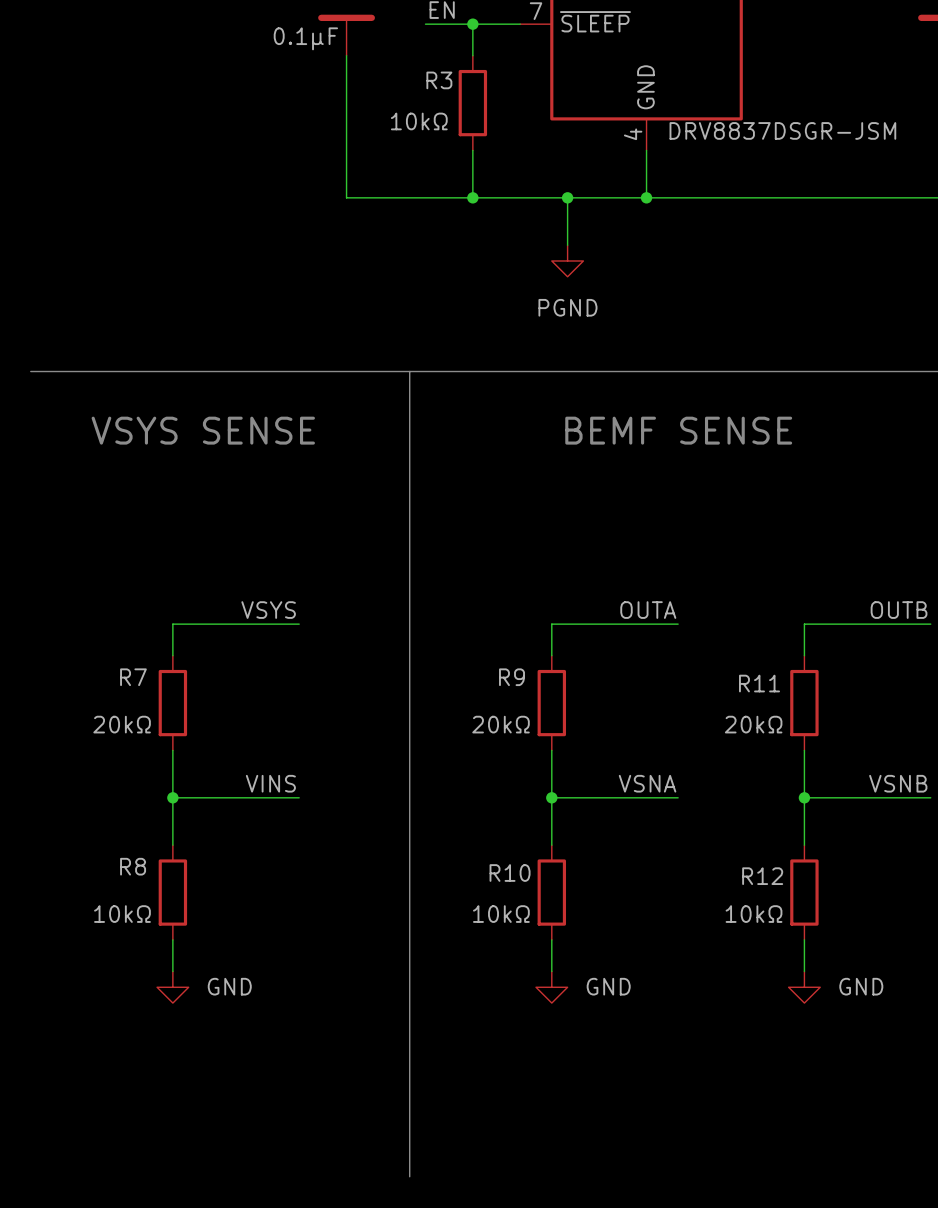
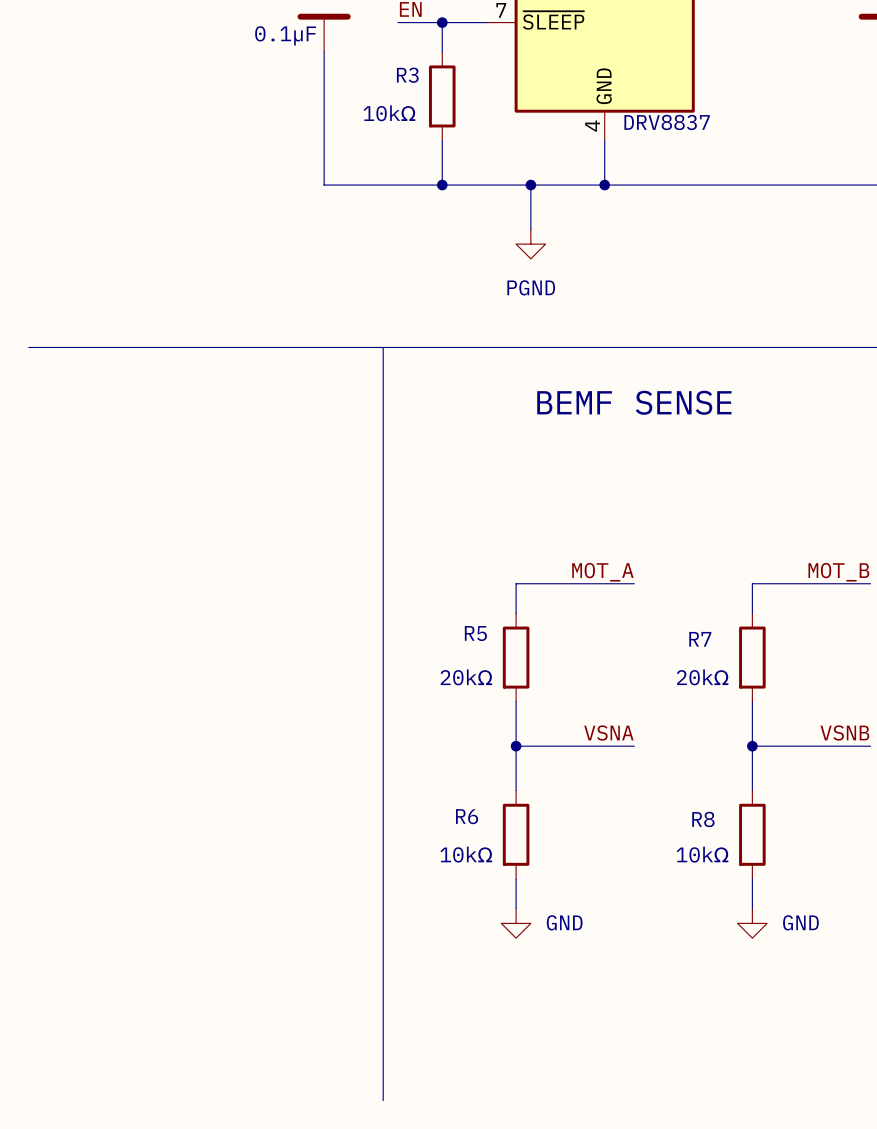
part value: DRV8837DSGR-JSM (782, 130) -> DRV8837 (667, 122)
text: VSYS SENSE (203, 430) -> none
label: VSYS (268, 610) -> none
label: OUTA (648, 610) -> MOT_A (602, 572)
label: OUTB (899, 610) -> MOT_B (838, 572)
wire: (299, 624) (172, 624) (172, 655) -> none
R9 name: R9 (512, 677) -> R5 (475, 633)
R11 name: R11 (759, 683) -> R7 (700, 639)
R7: 20kΩ (172, 703) -> none
wire: (172, 750) (172, 845) -> none
label: VINS (270, 783) -> none
wire: (172, 797) (299, 797) -> none
junction: (172, 797) -> none
R10 name: R10 (510, 873) -> R6 (467, 816)
R12 name: R12 (762, 876) -> R8 (703, 819)
R8: 10kΩ (172, 892) -> none
wire: (172, 939) (172, 971) -> none
power symbol: GND (172, 987) -> none

